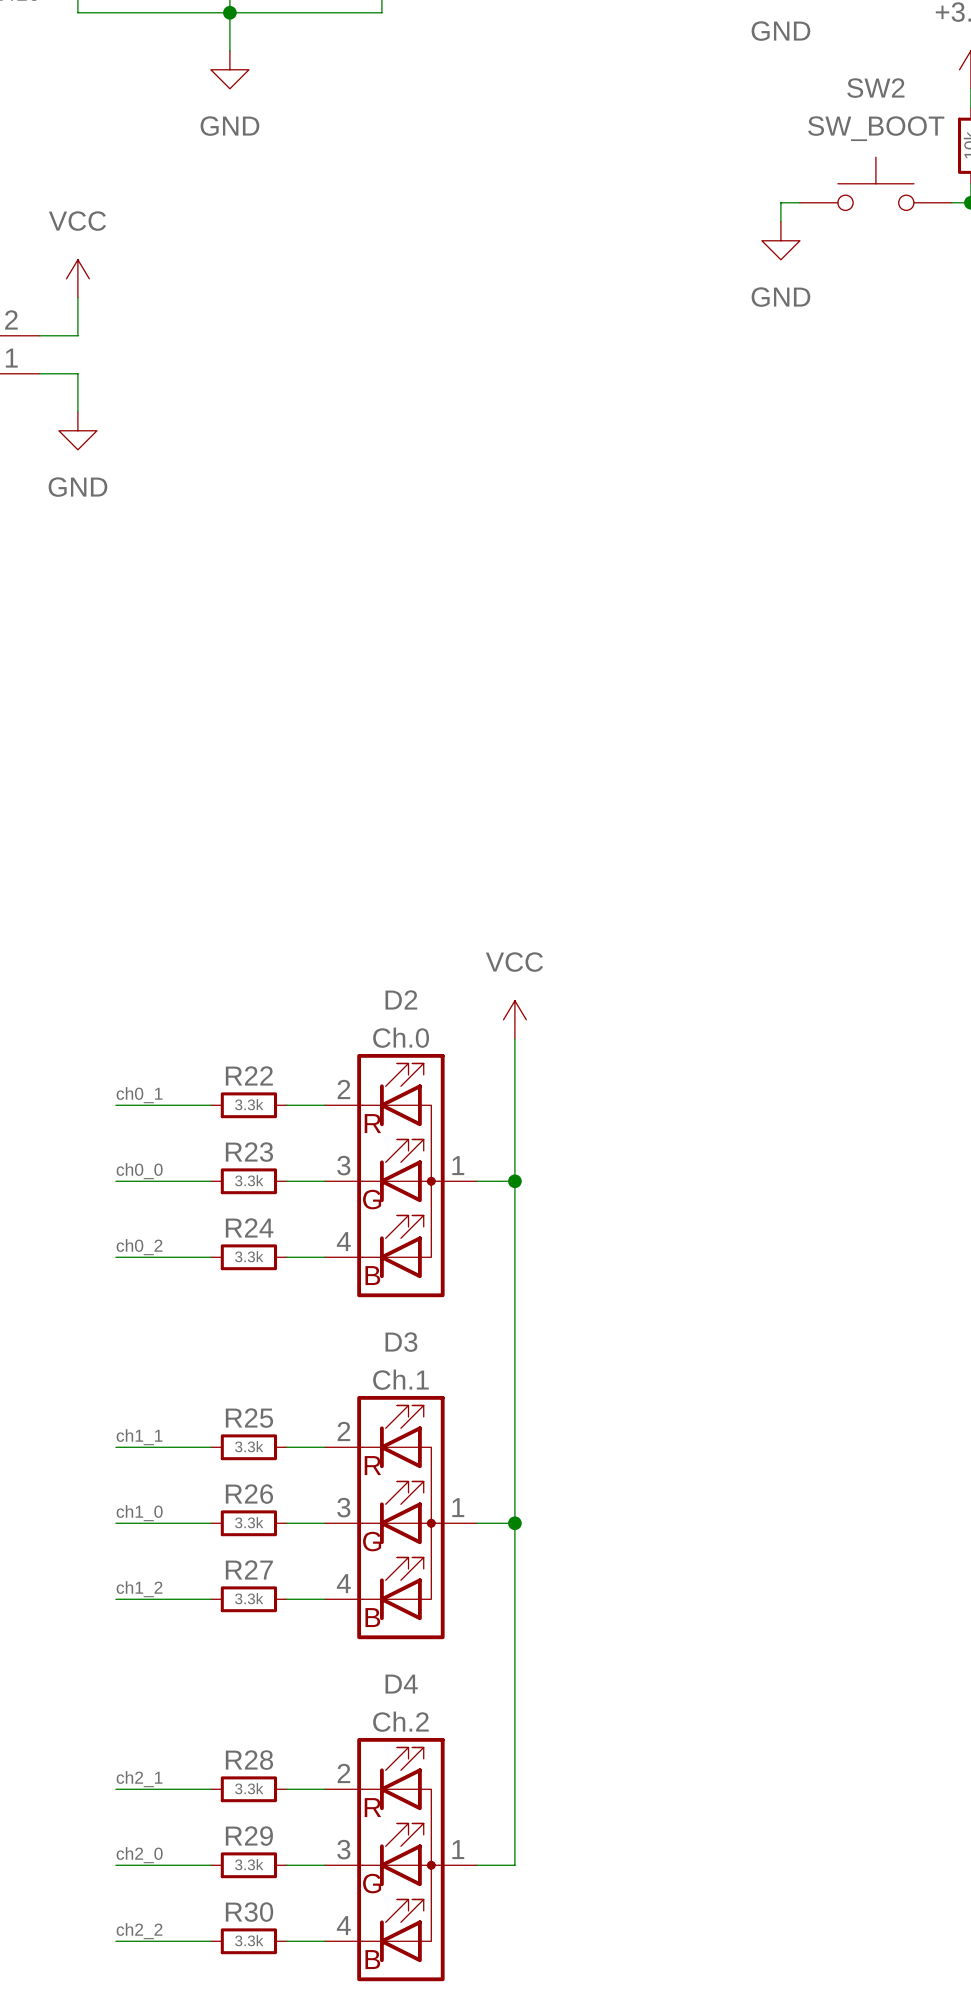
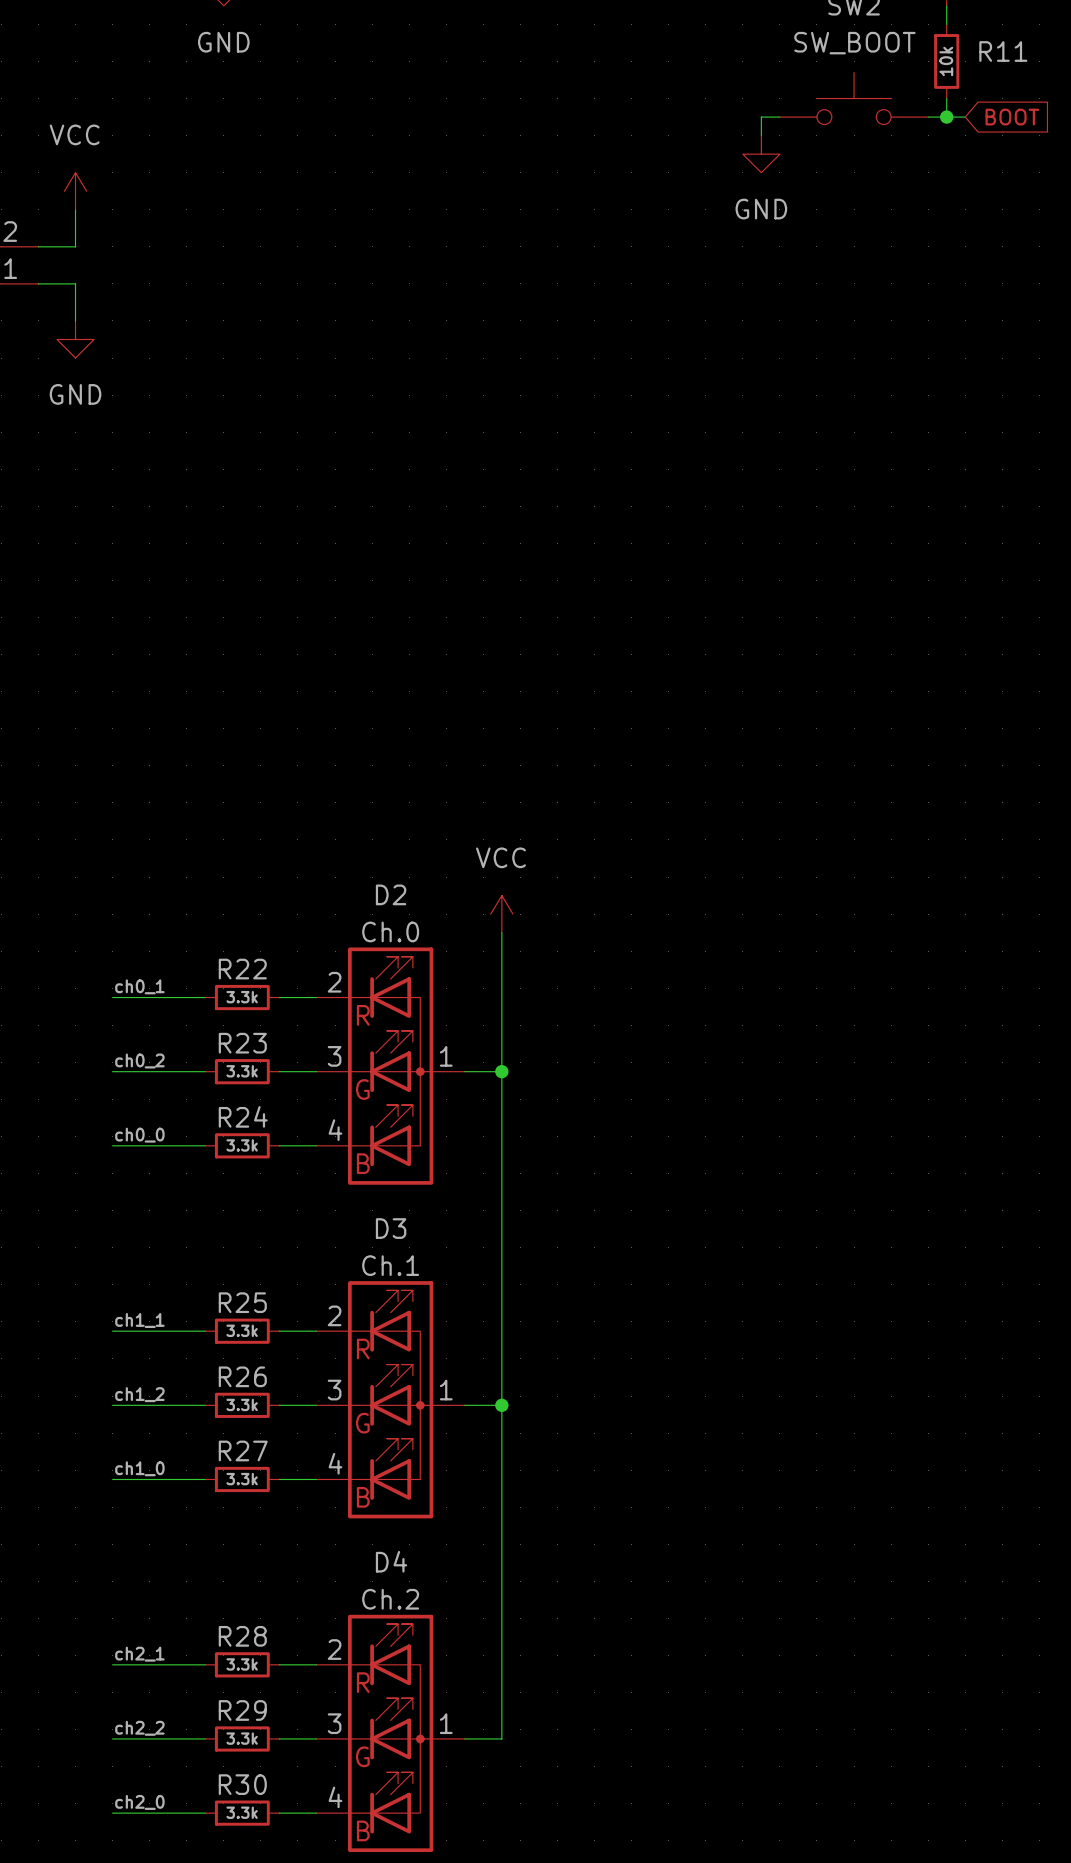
label: ch0_0 (139, 1171) -> ch0_2 (139, 1060)
label: ch0_2 (139, 1247) -> ch0_0 (139, 1135)
label: ch1_0 (139, 1513) -> ch1_2 (139, 1394)
label: ch1_2 (139, 1589) -> ch1_0 (139, 1468)
label: ch2_0 (139, 1855) -> ch2_2 (139, 1728)
label: ch2_2 (139, 1931) -> ch2_0 (139, 1802)

